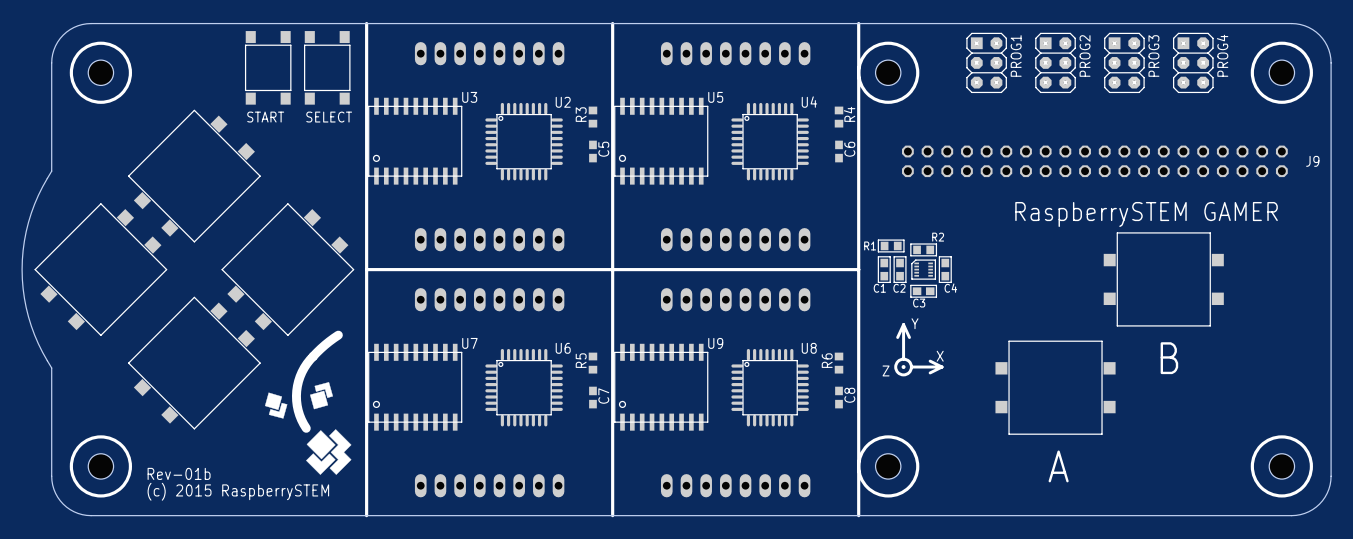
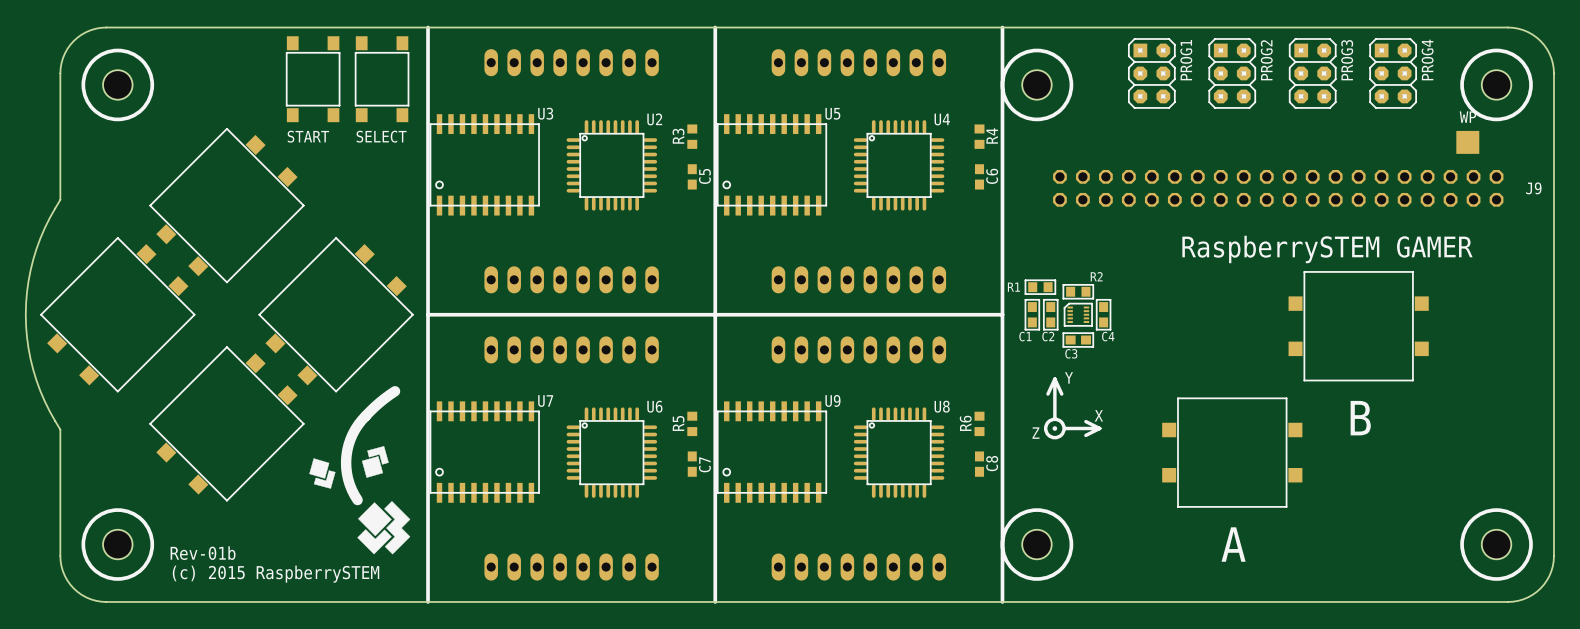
WP: none -> (1467, 142)

